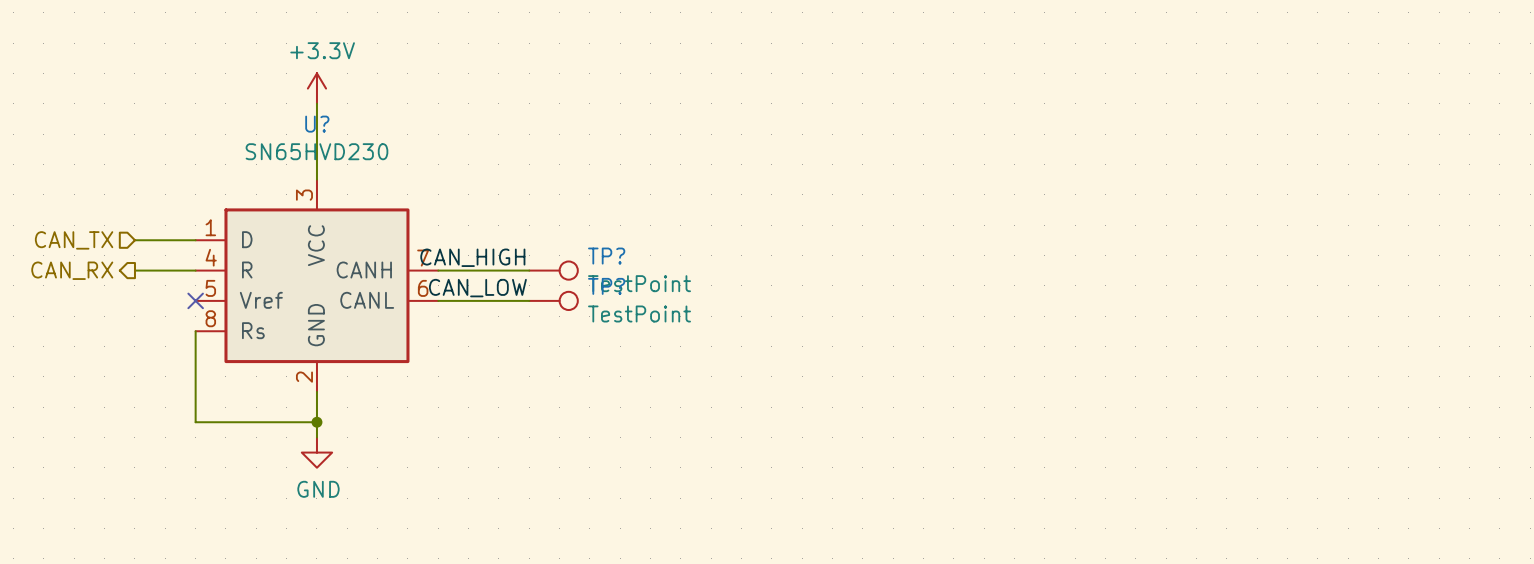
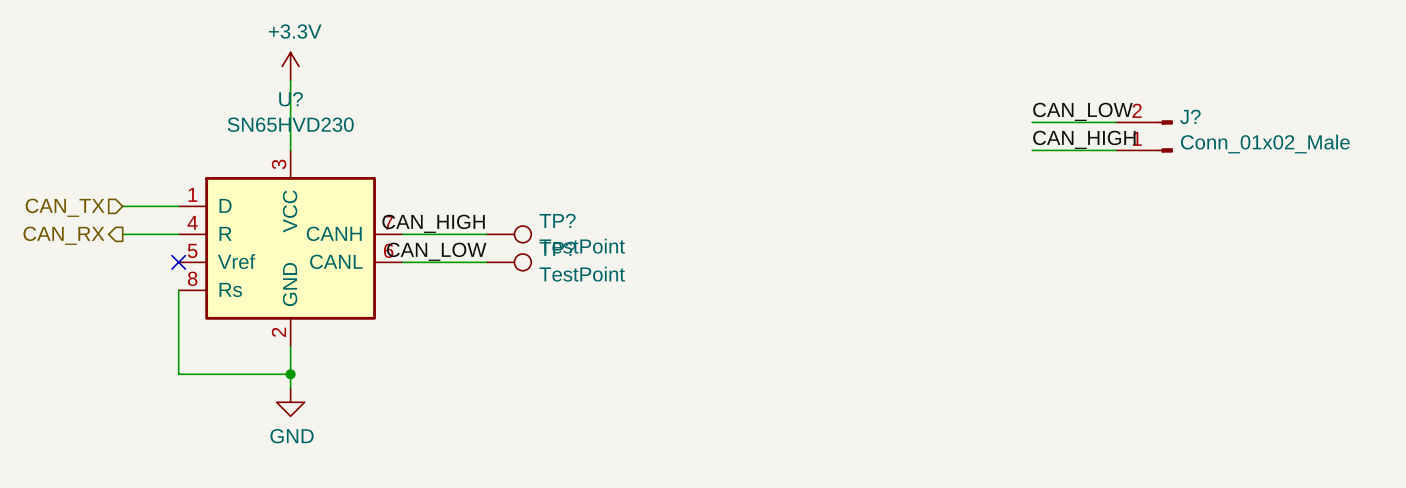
label: none -> CAN_LOW (1082, 111)
wire: none -> (1032, 122) (1116, 122)
J?: none -> Conn_01x02_Male (1144, 136)
label: none -> CAN_HIGH (1084, 139)
wire: none -> (1032, 150) (1116, 150)

